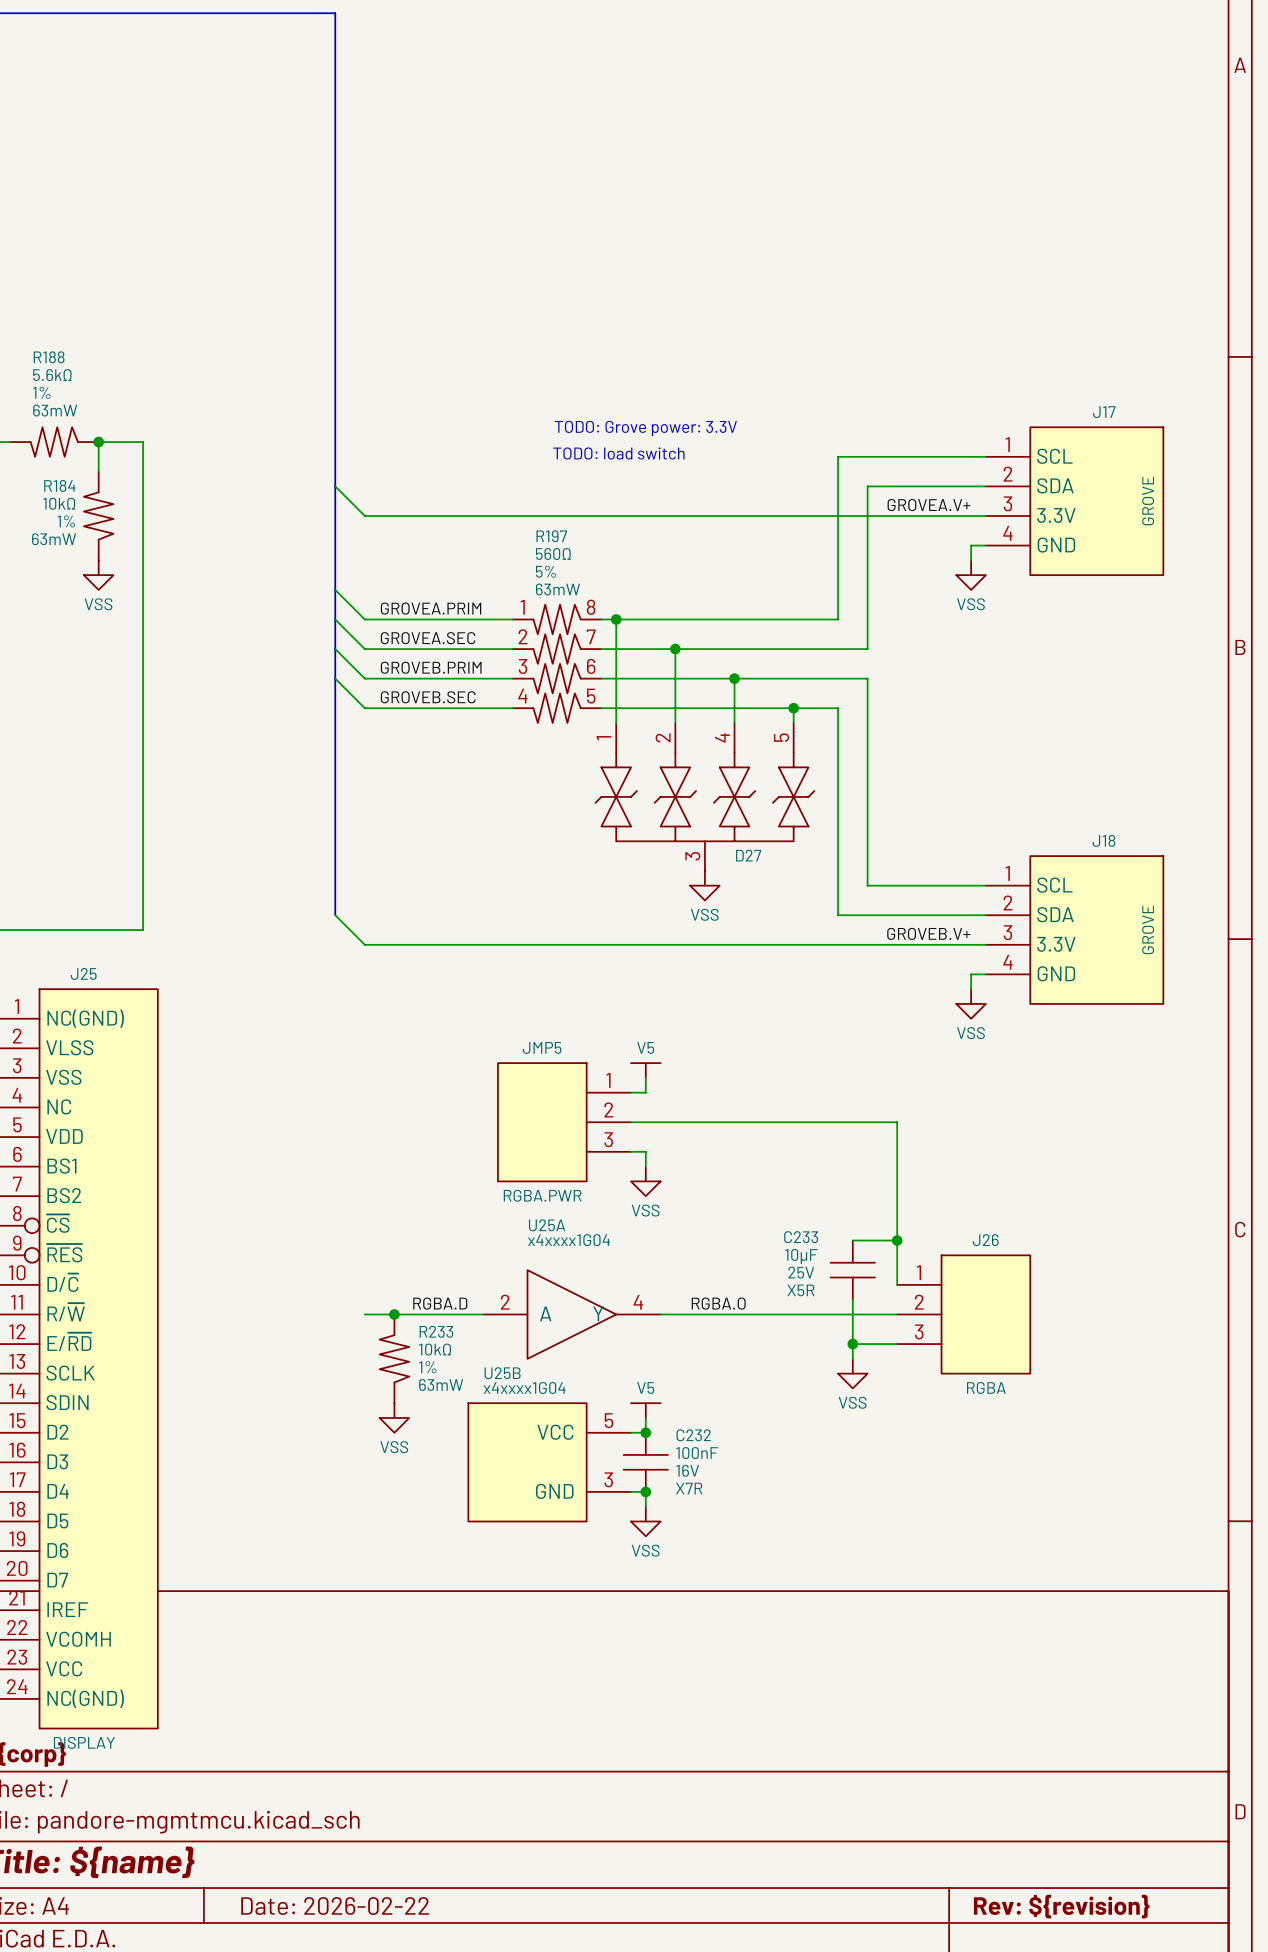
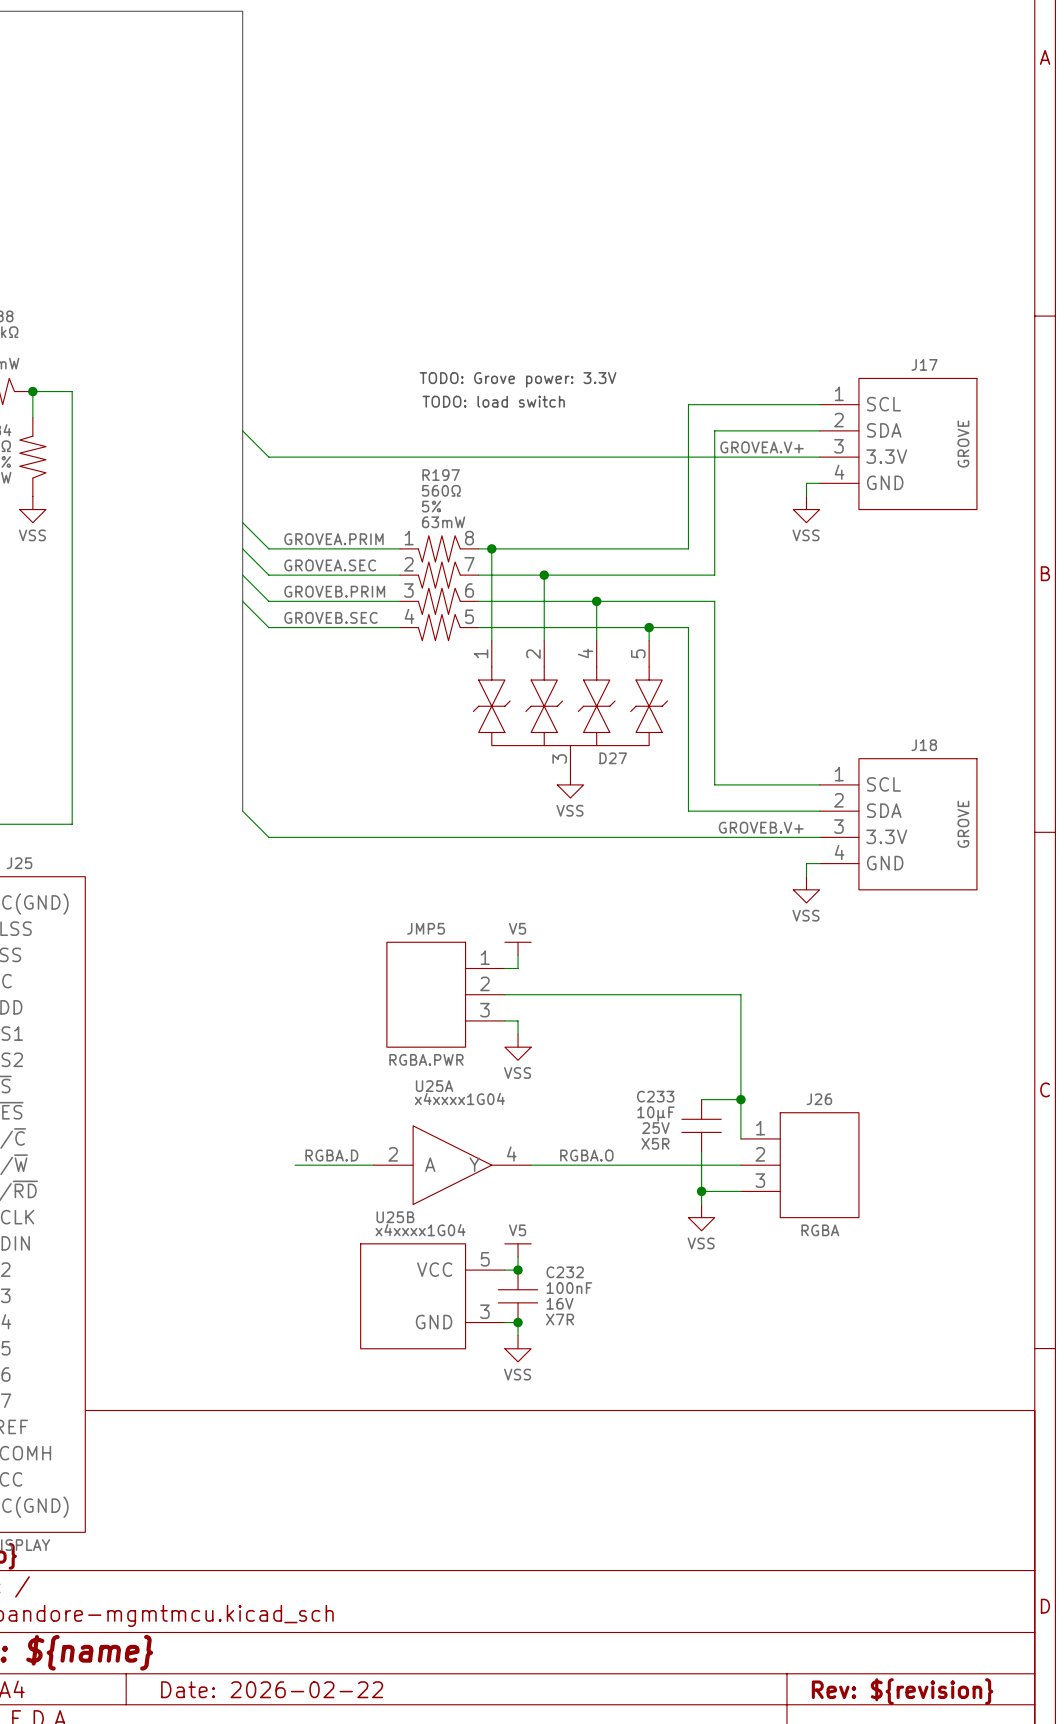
wire: (364, 1314) (394, 1314) -> none
junction: (394, 1314) -> none
R233: (394, 1358) -> none
power symbol: VSS (394, 1417) -> none

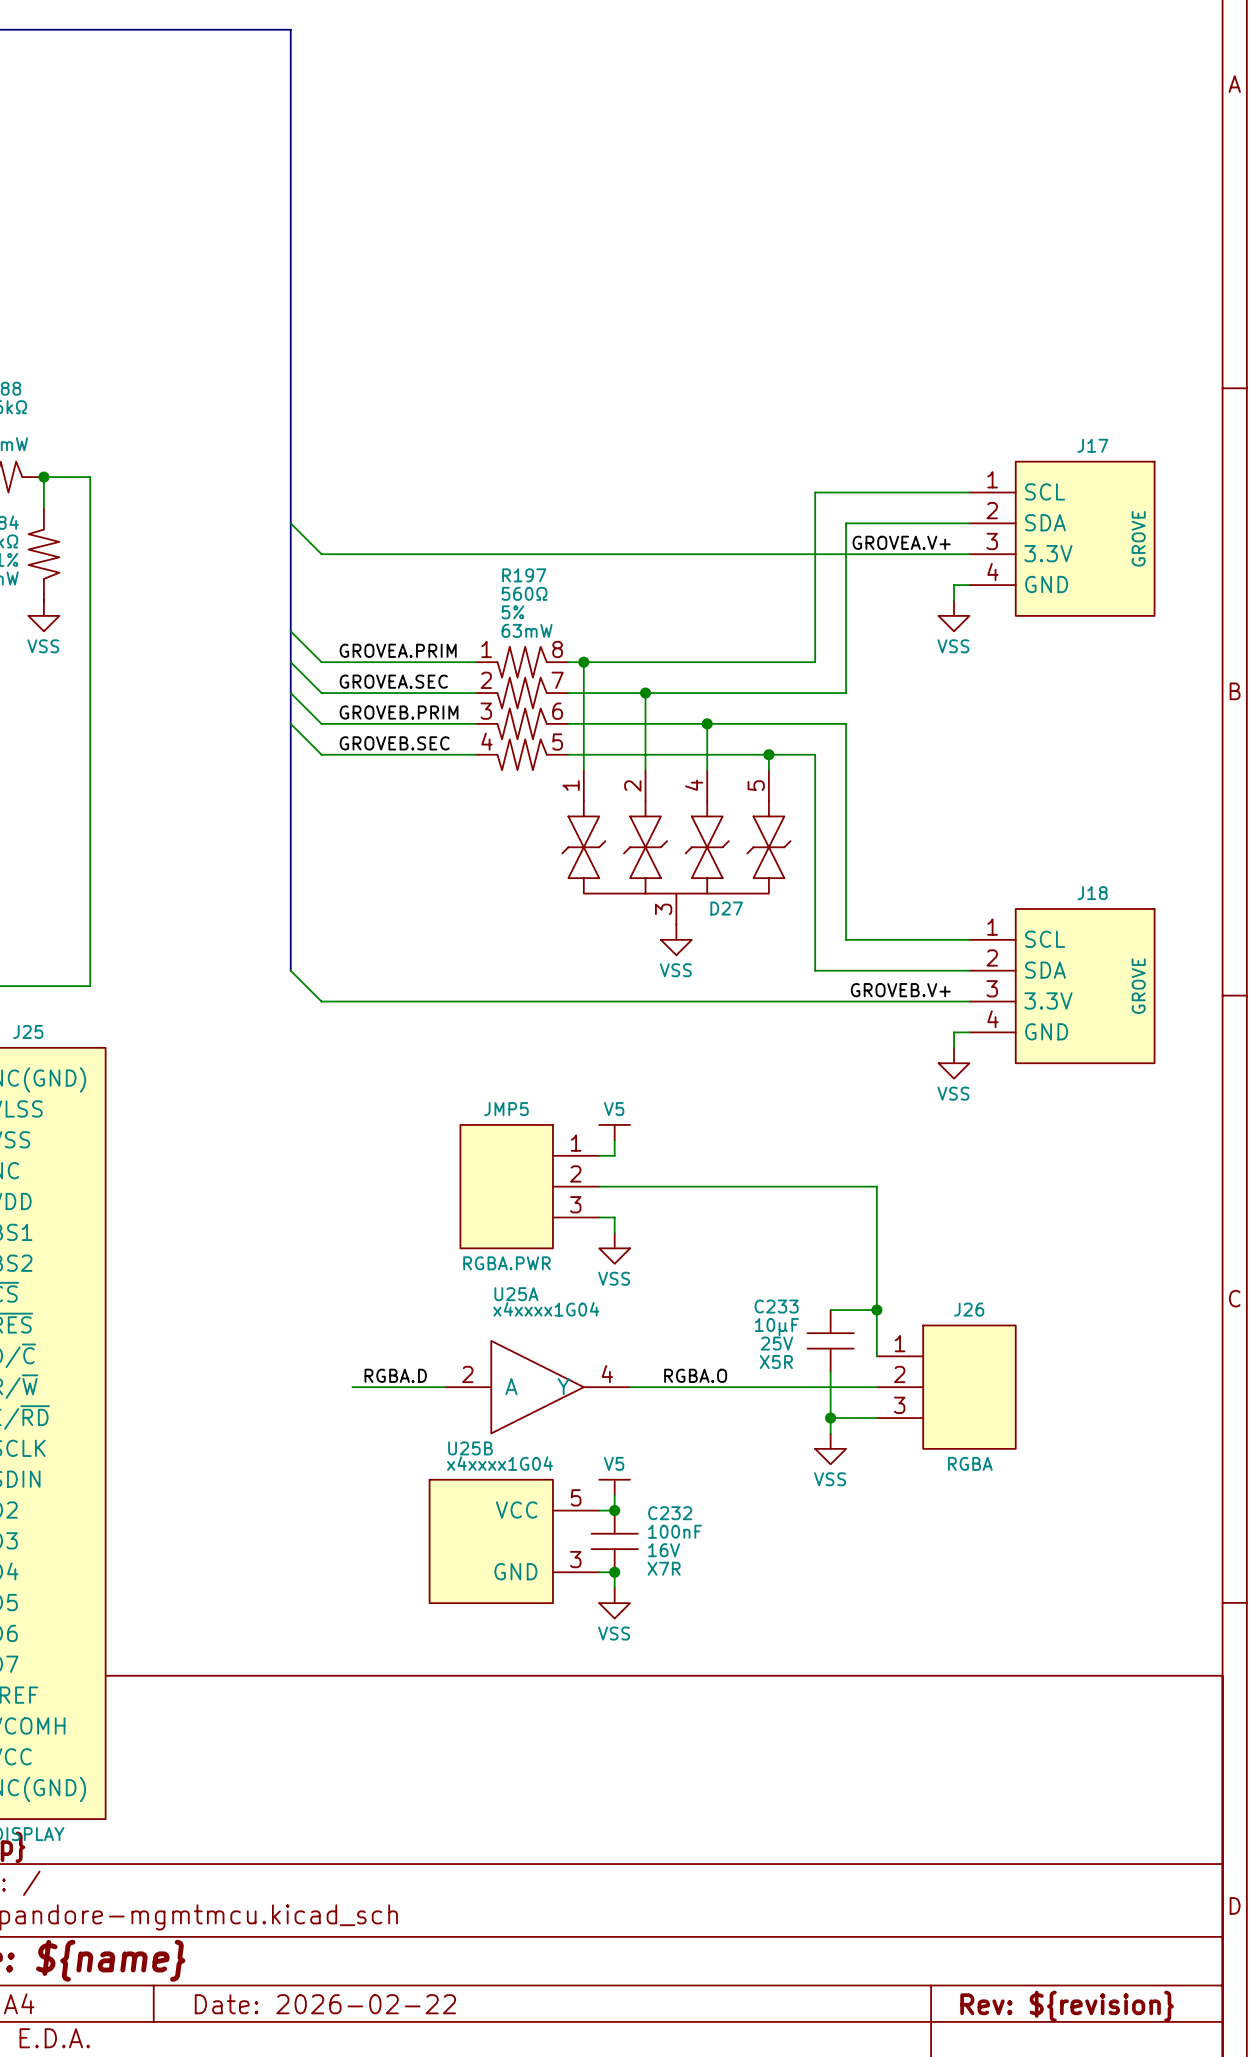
text: TODO: Grove power: 3.3V (518, 379) -> none
text: TODO: load switch (493, 401) -> none

